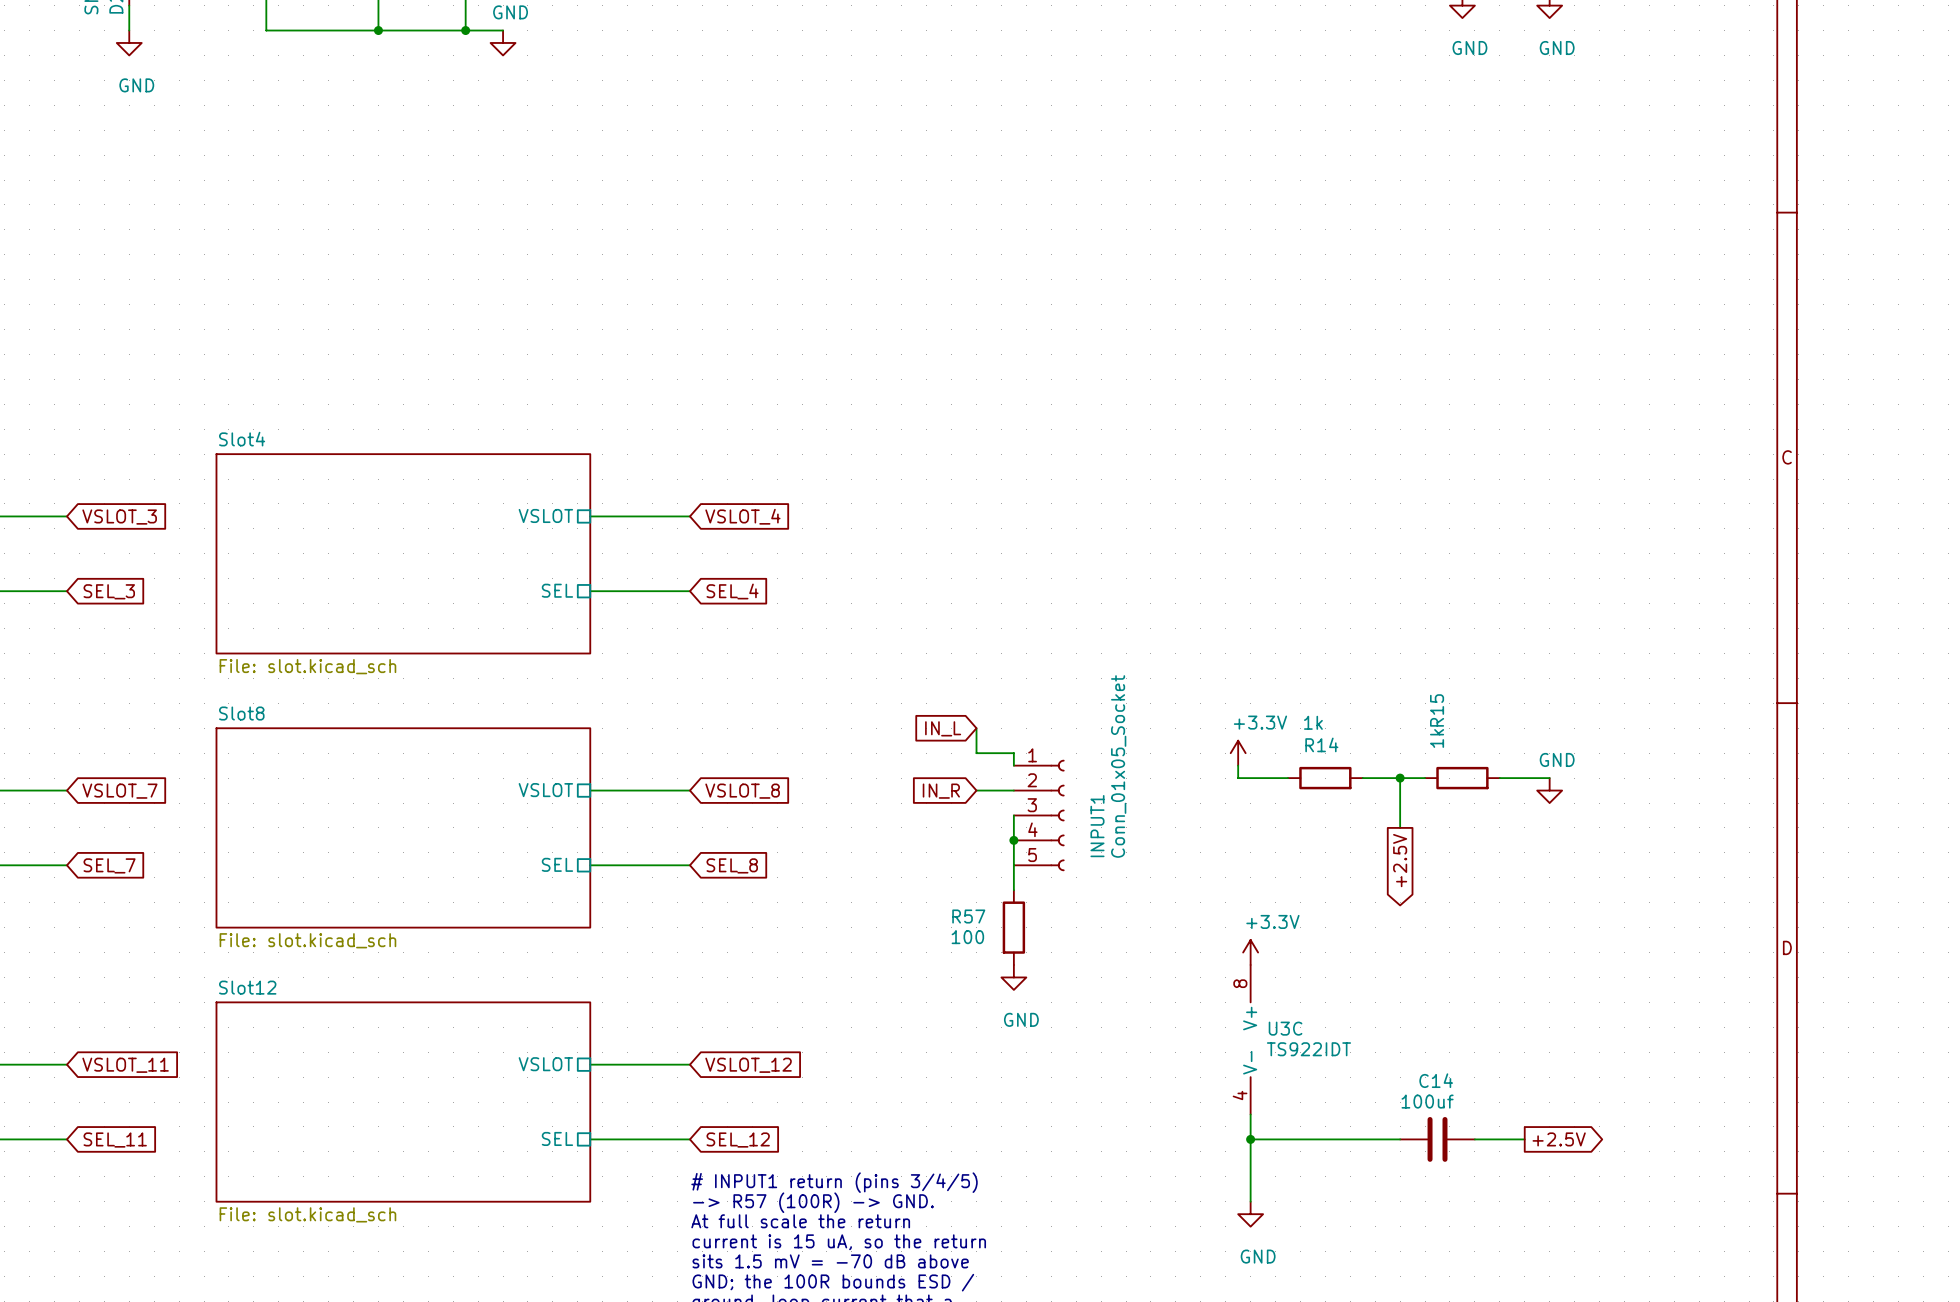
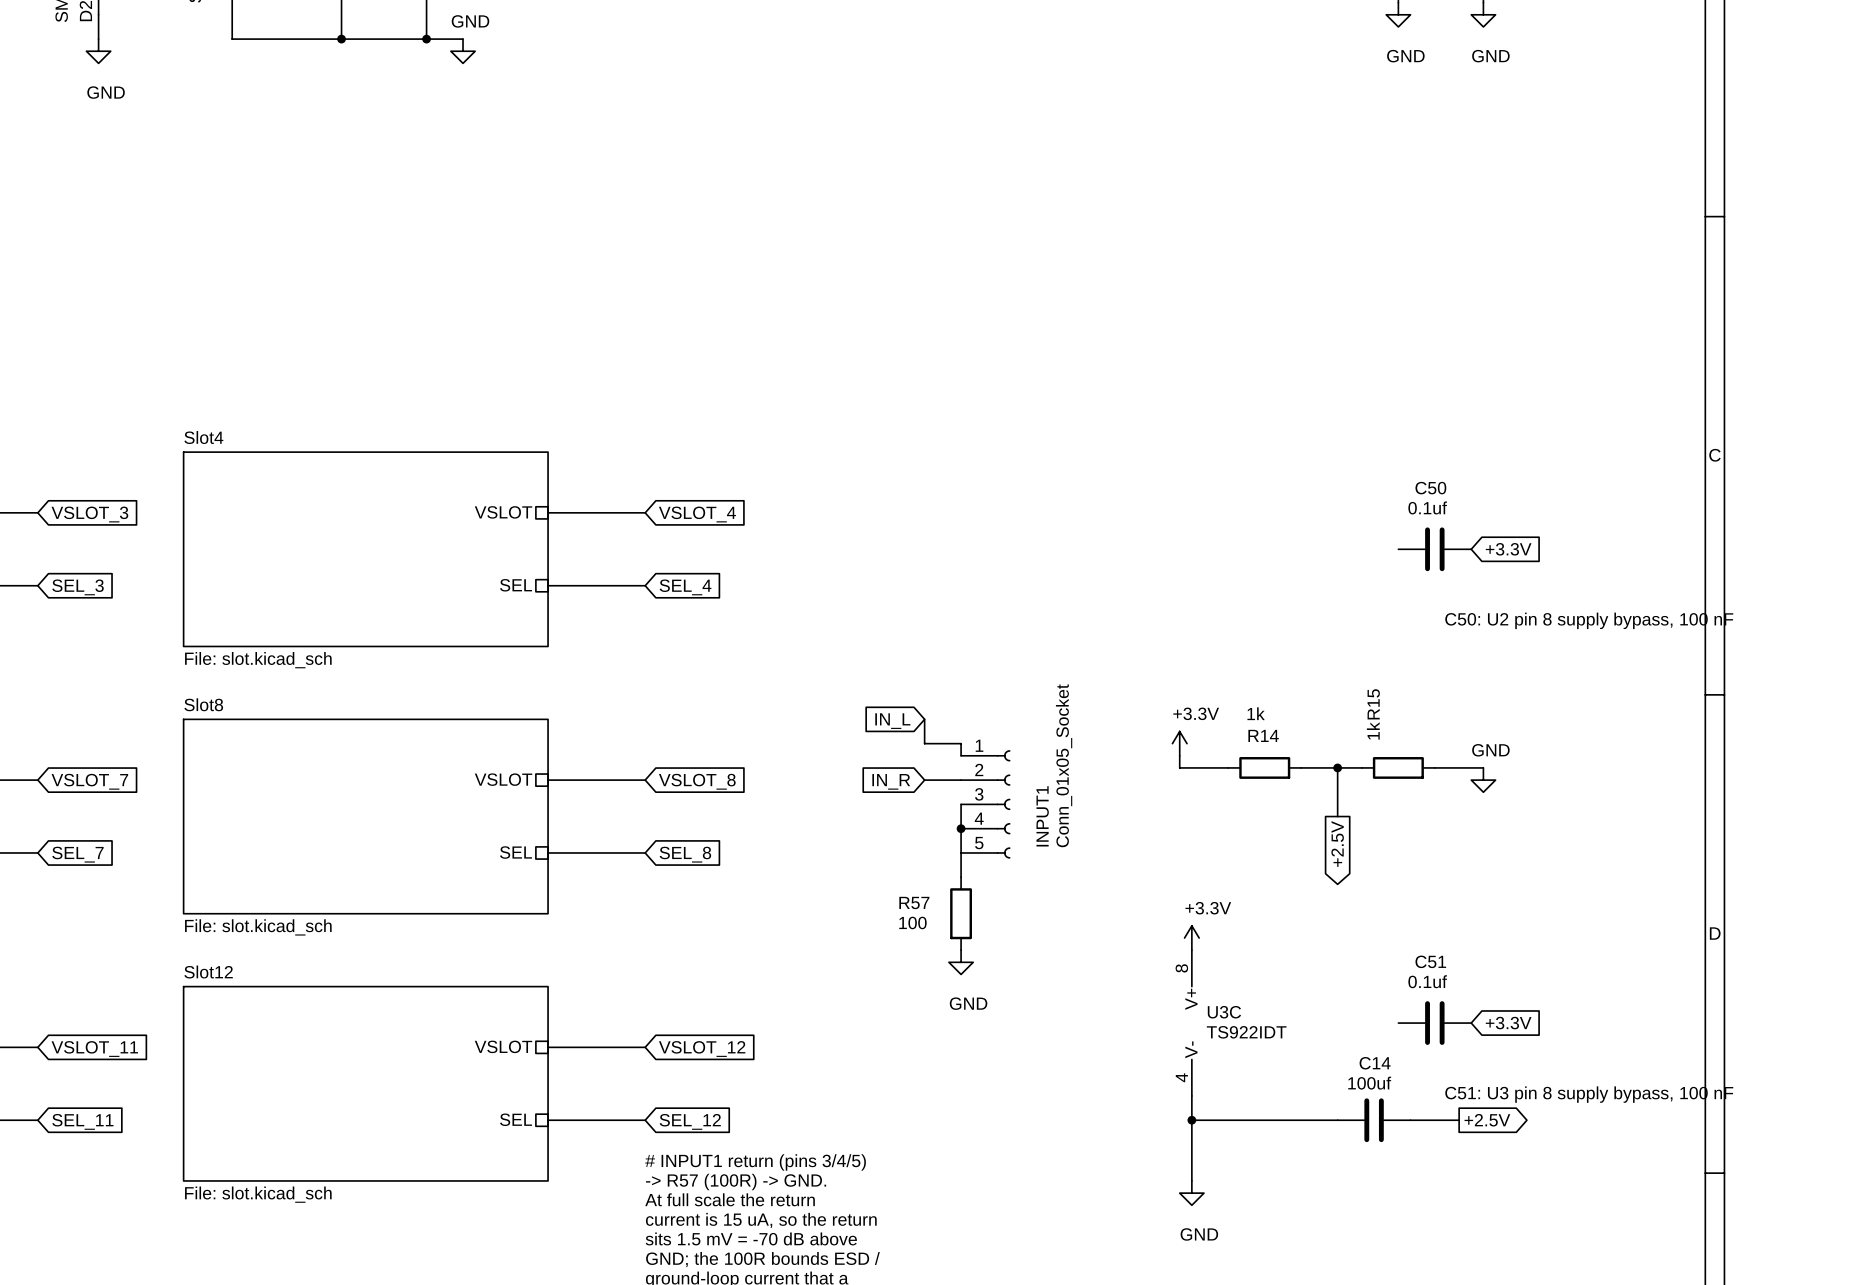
C50: none -> 0.1uf (1434, 549)
global label: none -> +3.3V (1508, 549)
text: none -> C50: U2 pin 8 supply bypass, 100 nF (1589, 620)
C51: none -> 0.1uf (1434, 1023)
global label: none -> +3.3V (1508, 1023)
text: none -> C51: U3 pin 8 supply bypass, 100 nF (1589, 1094)

